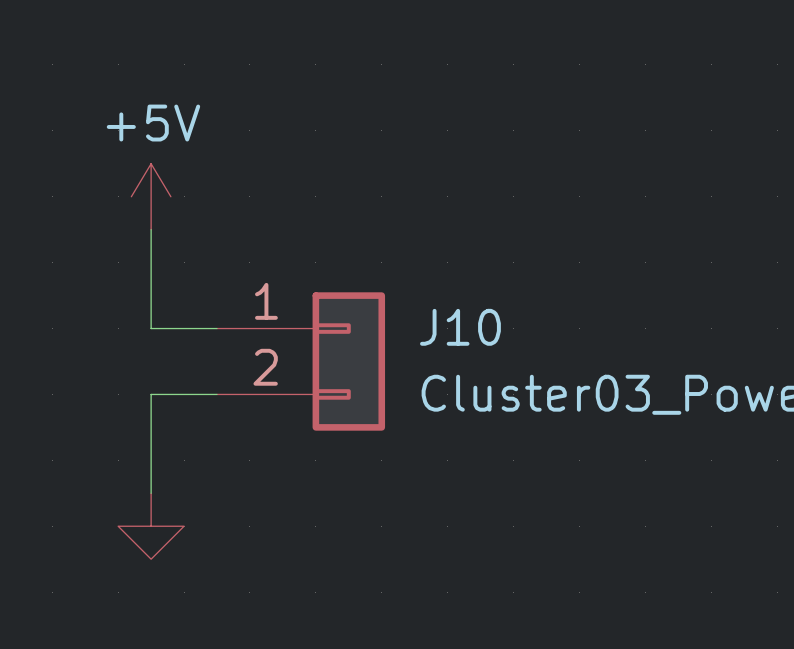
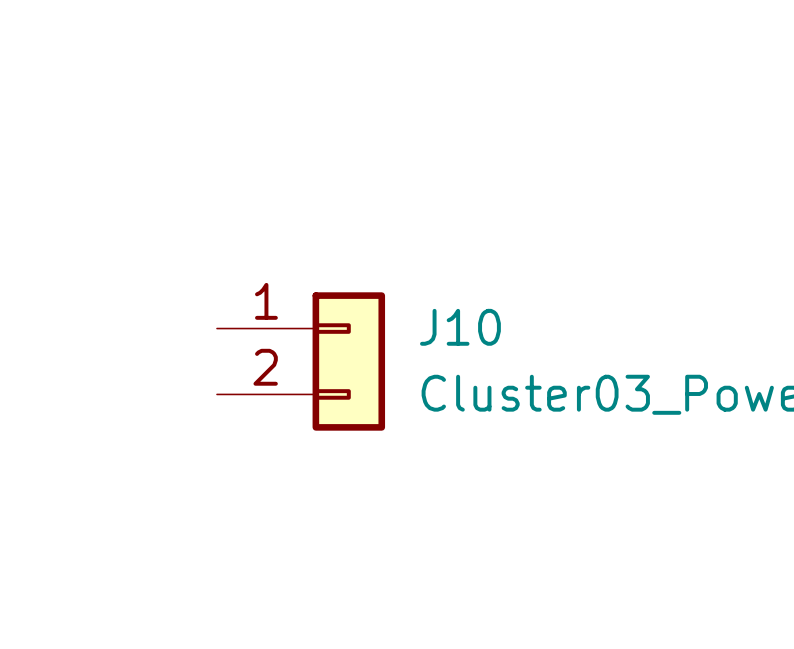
power symbol: +5V (151, 196) -> none
wire: (151, 229) (151, 328) (217, 328) -> none
wire: (217, 394) (151, 394) (151, 493) -> none
power symbol: (151, 526) -> none

